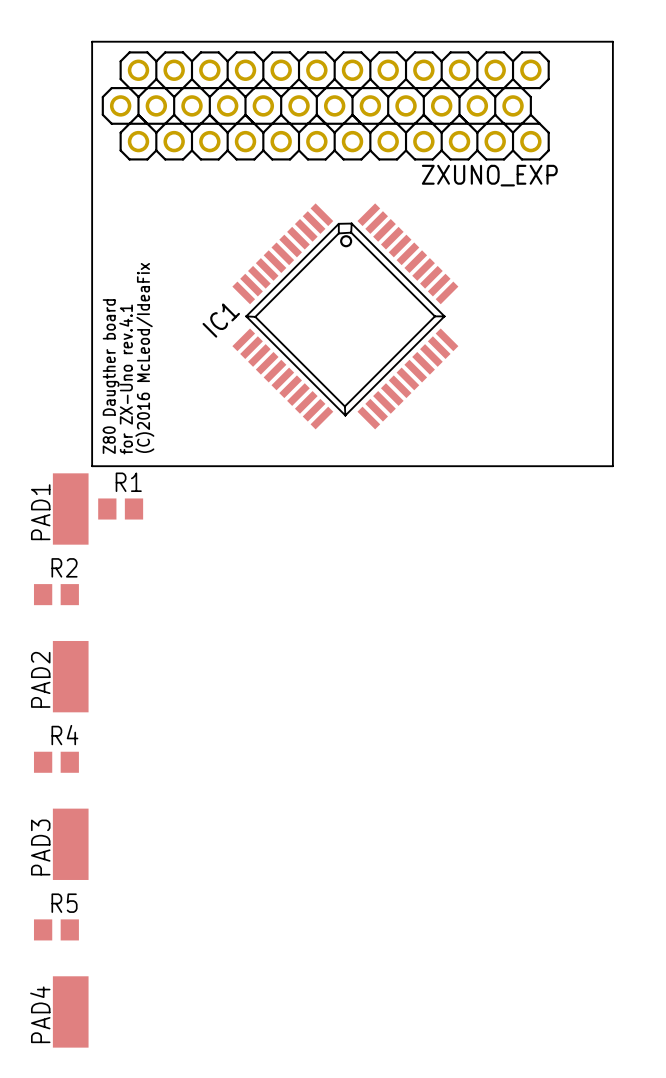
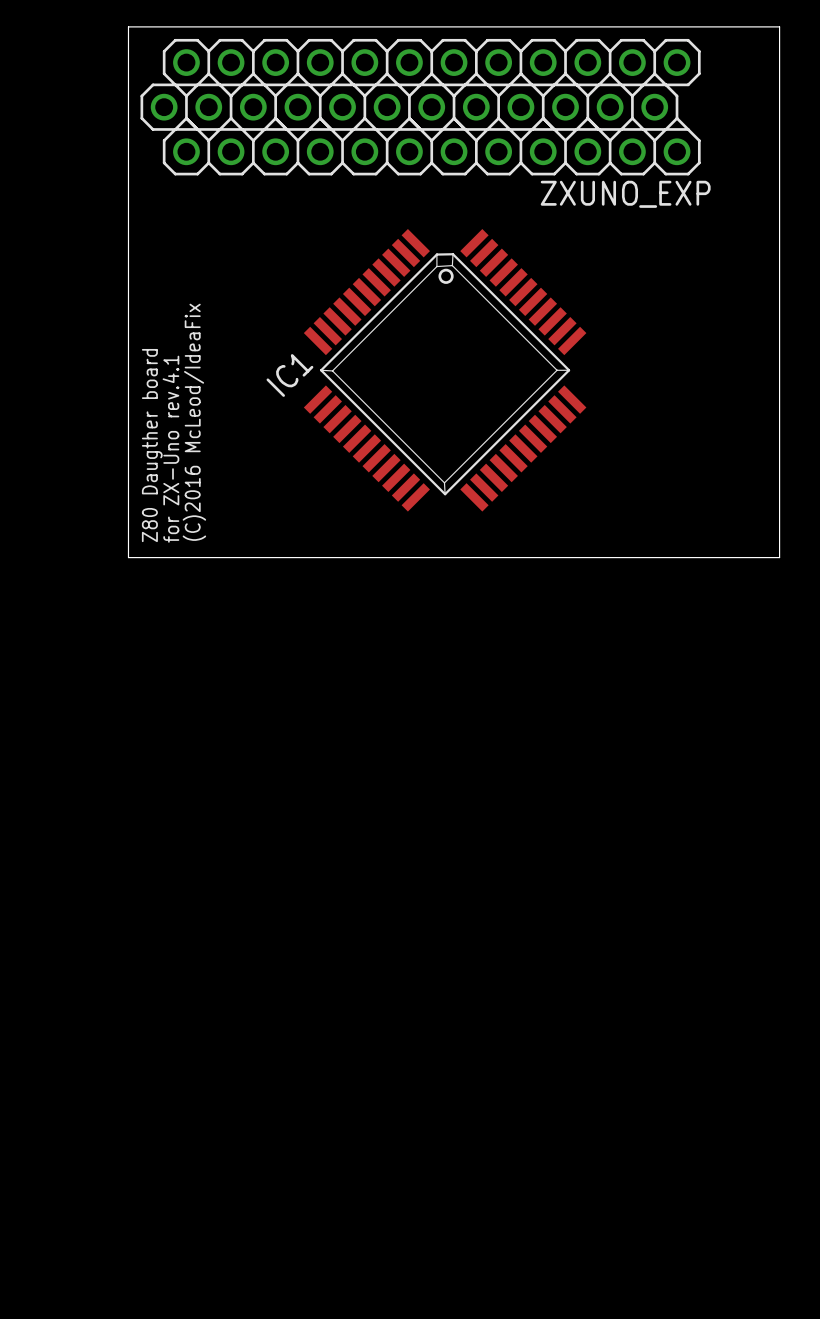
PAD1: (70, 509) -> none
R1: (120, 509) -> none
R2: (56, 594) -> none
PAD2: (70, 676) -> none
R4: (56, 762) -> none
PAD3: (70, 844) -> none
R5: (56, 929) -> none
PAD4: (70, 1011) -> none

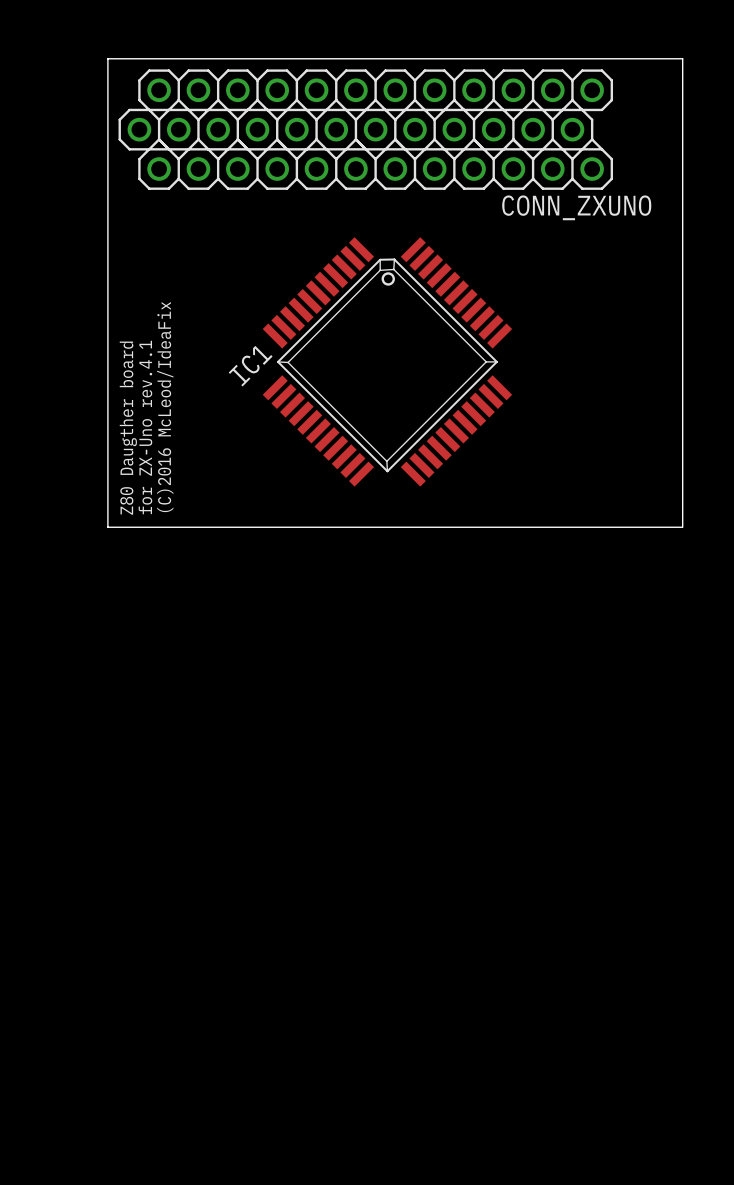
ZXUNO_EXP name: ZXUNO_EXP (625, 194) -> CONN_ZXUNO (576, 207)

